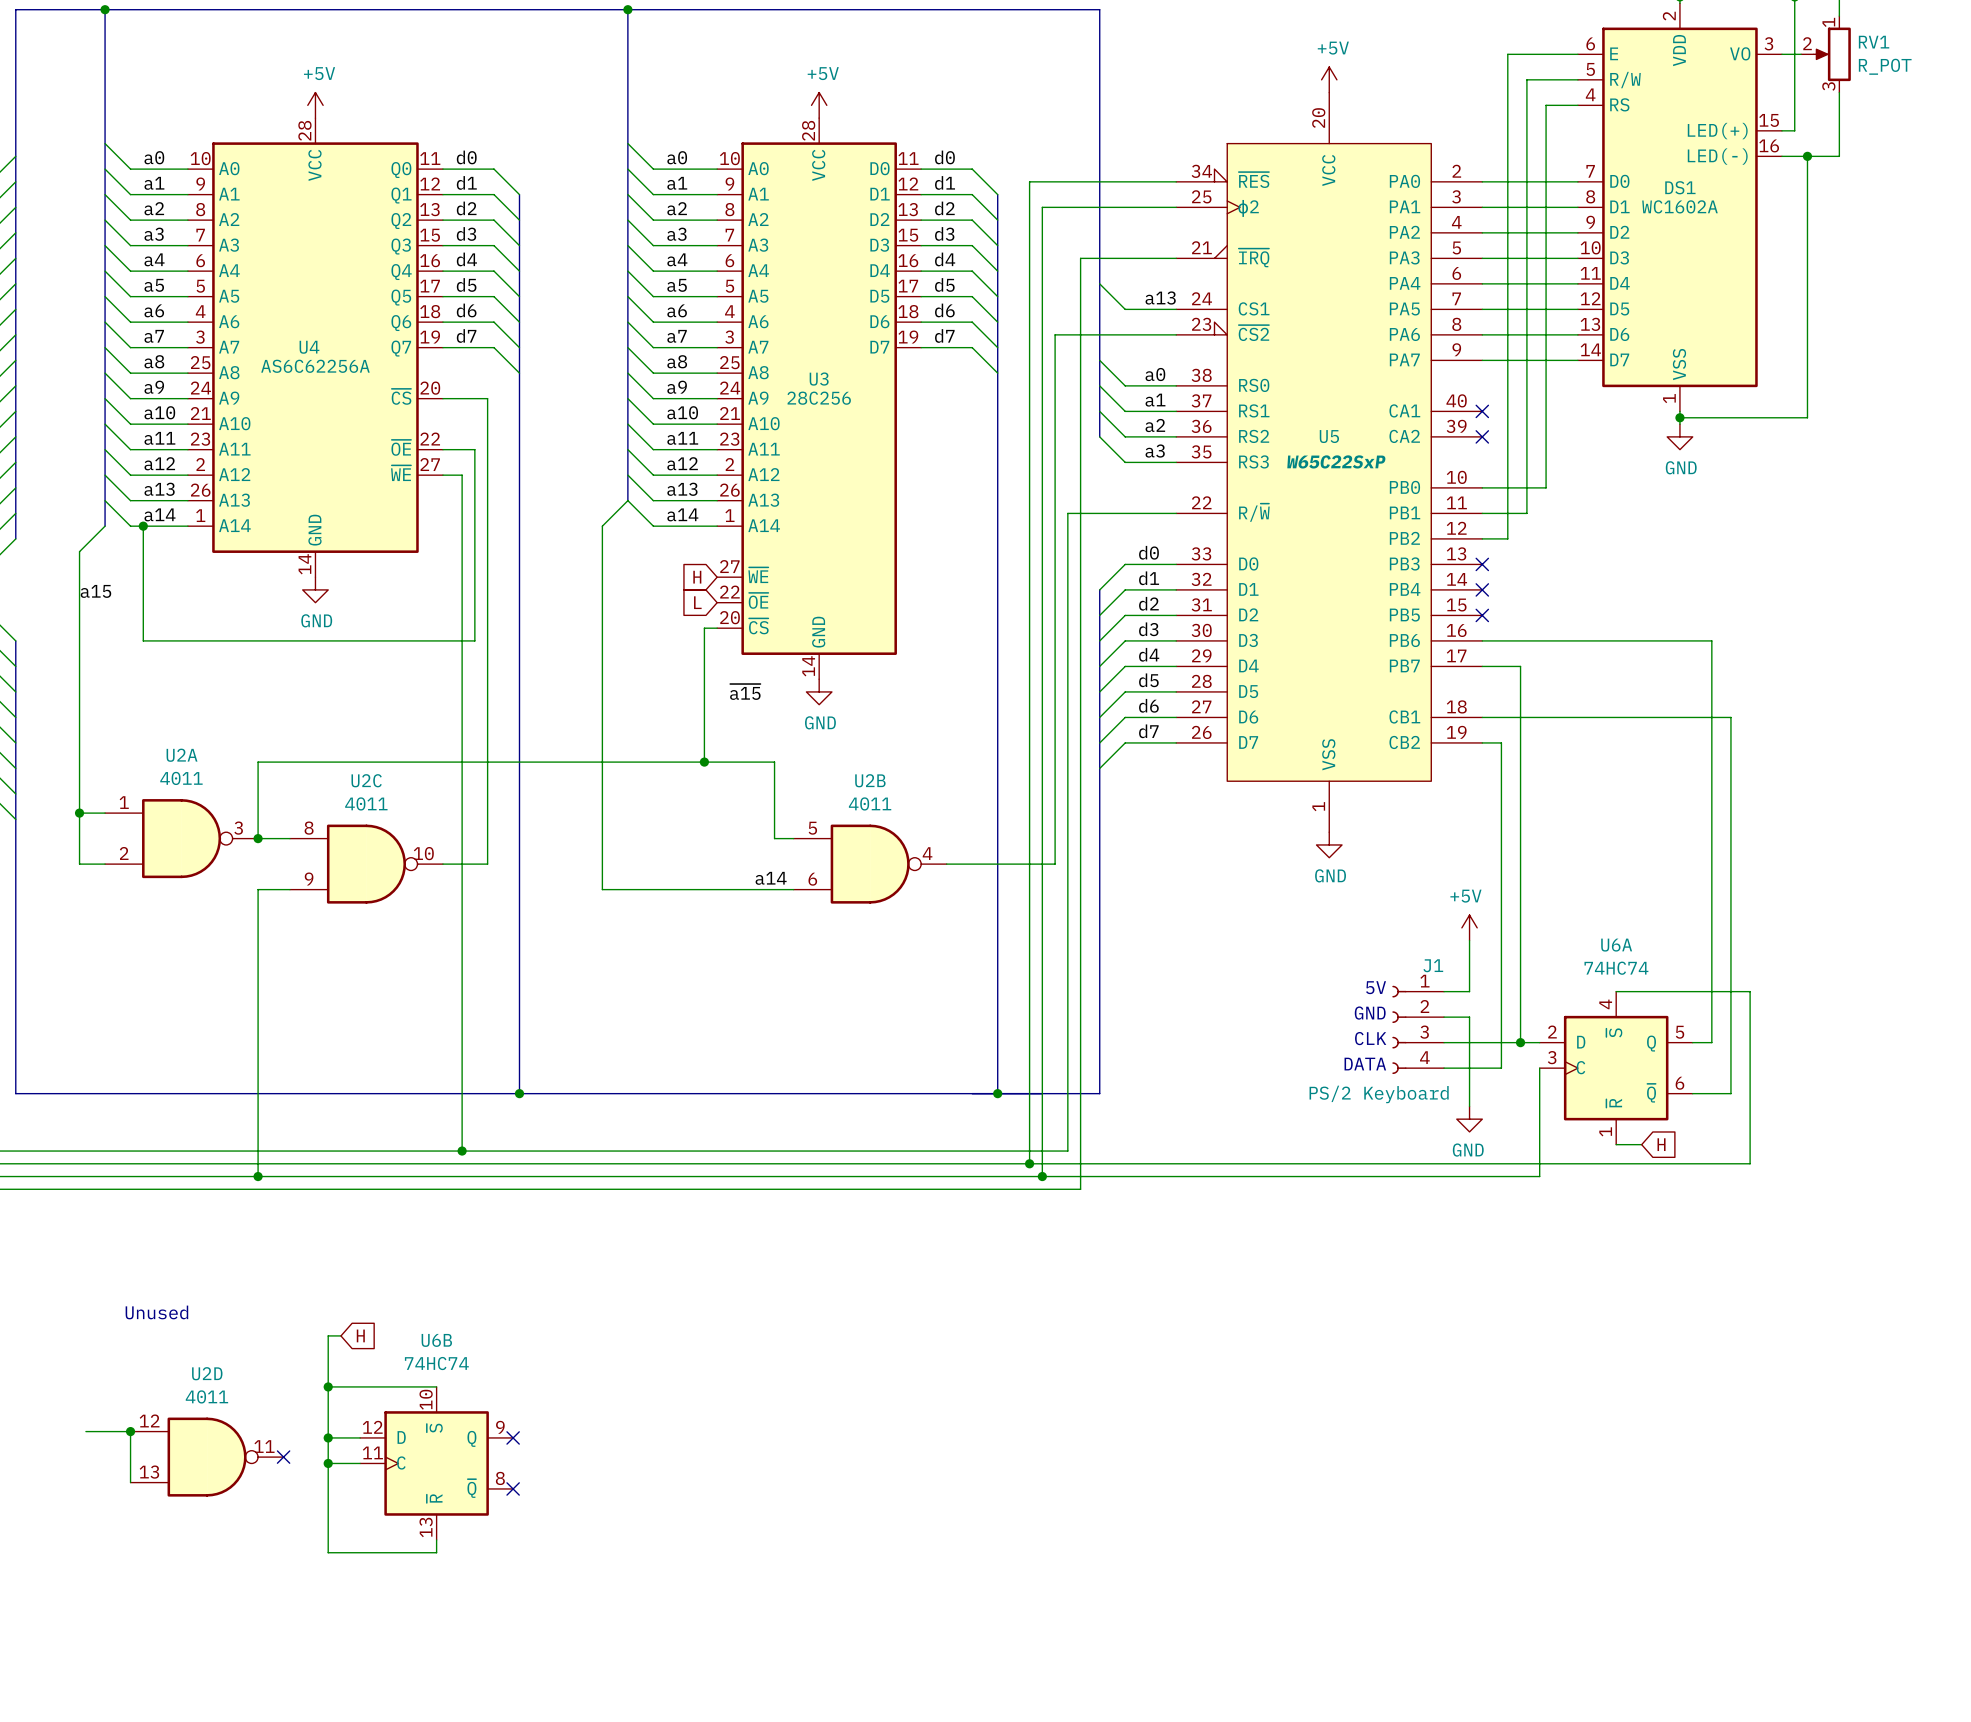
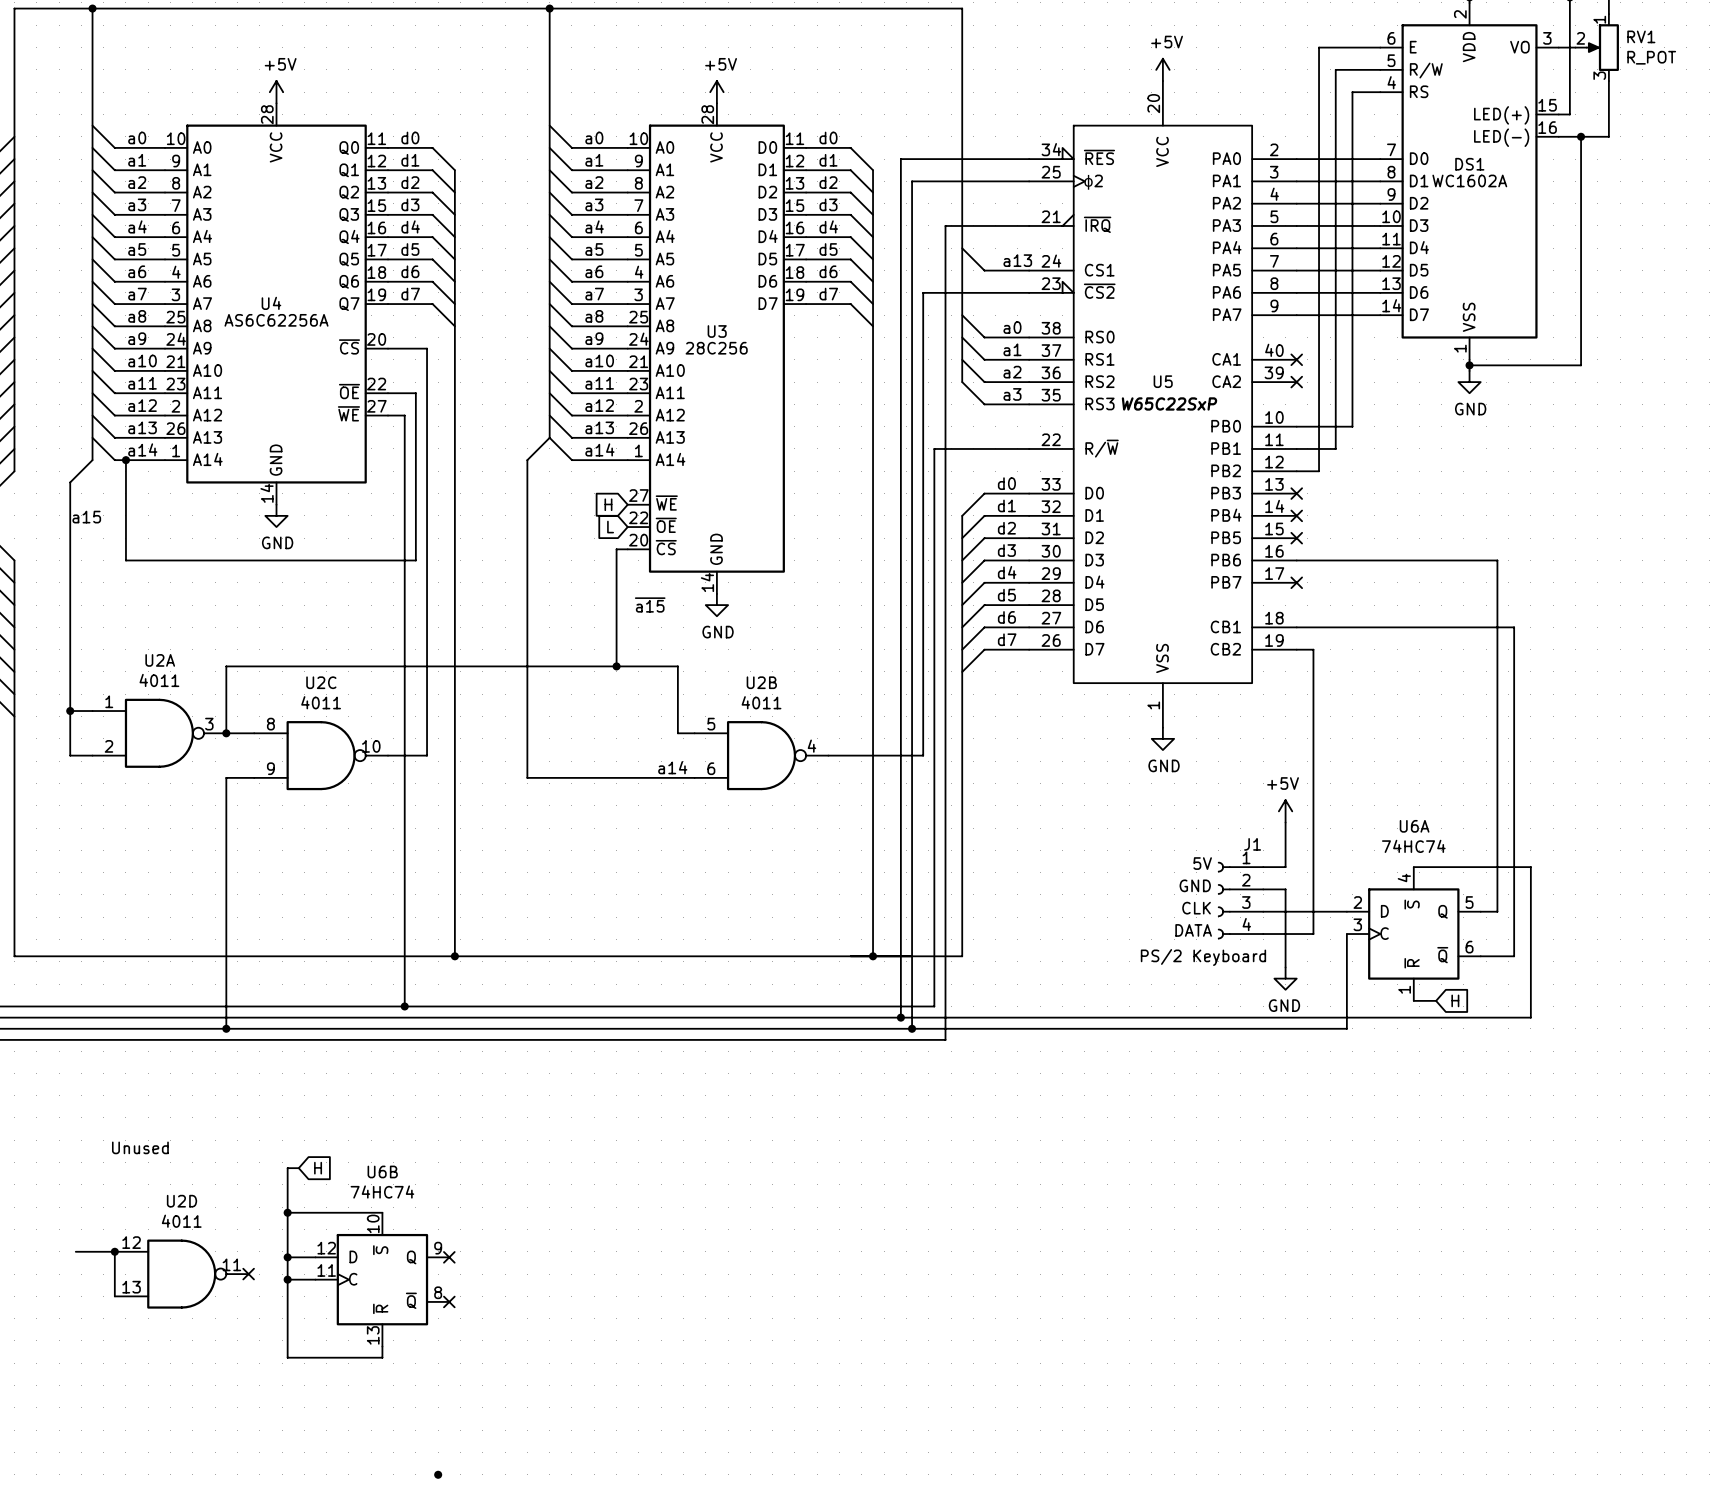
wire: (1482, 666) (1520, 666) (1520, 1042) -> none
no-connect mark: none -> (1296, 582)
junction: (1520, 1042) -> none
junction: none -> (438, 1474)

